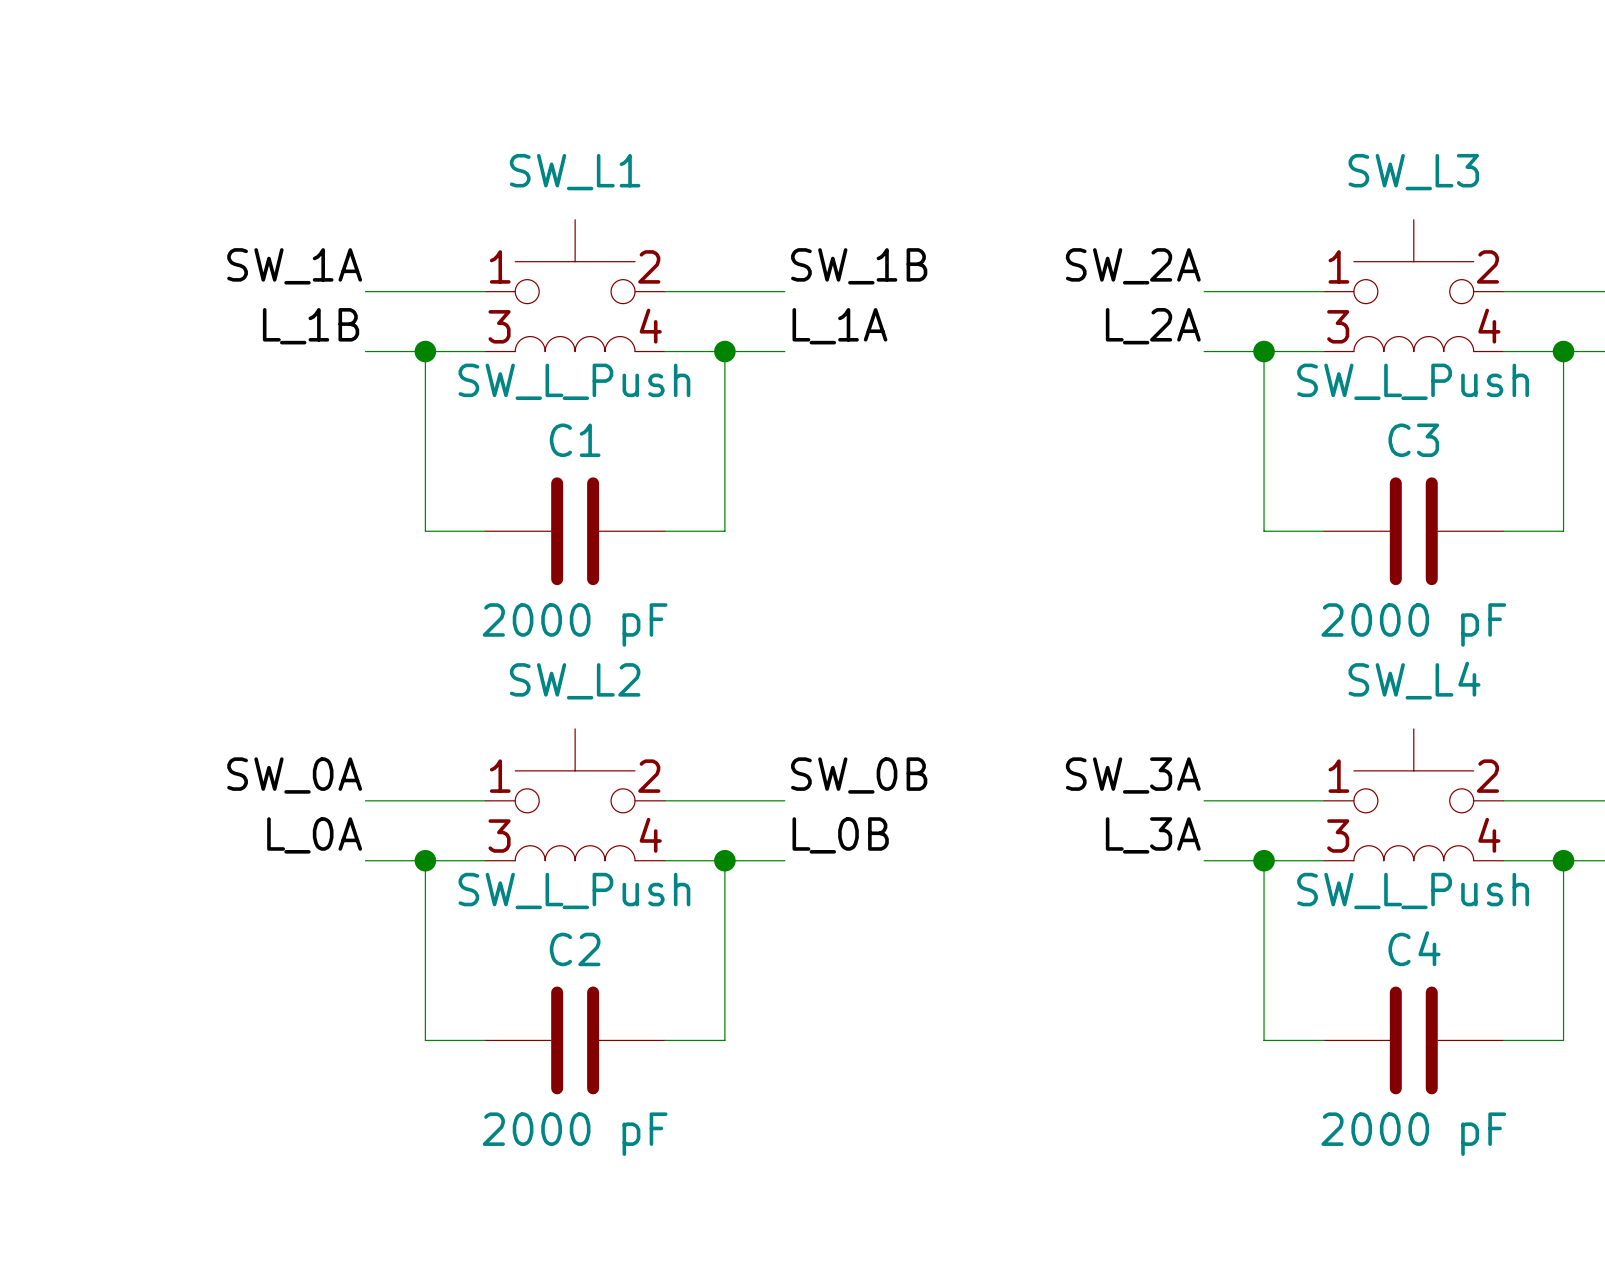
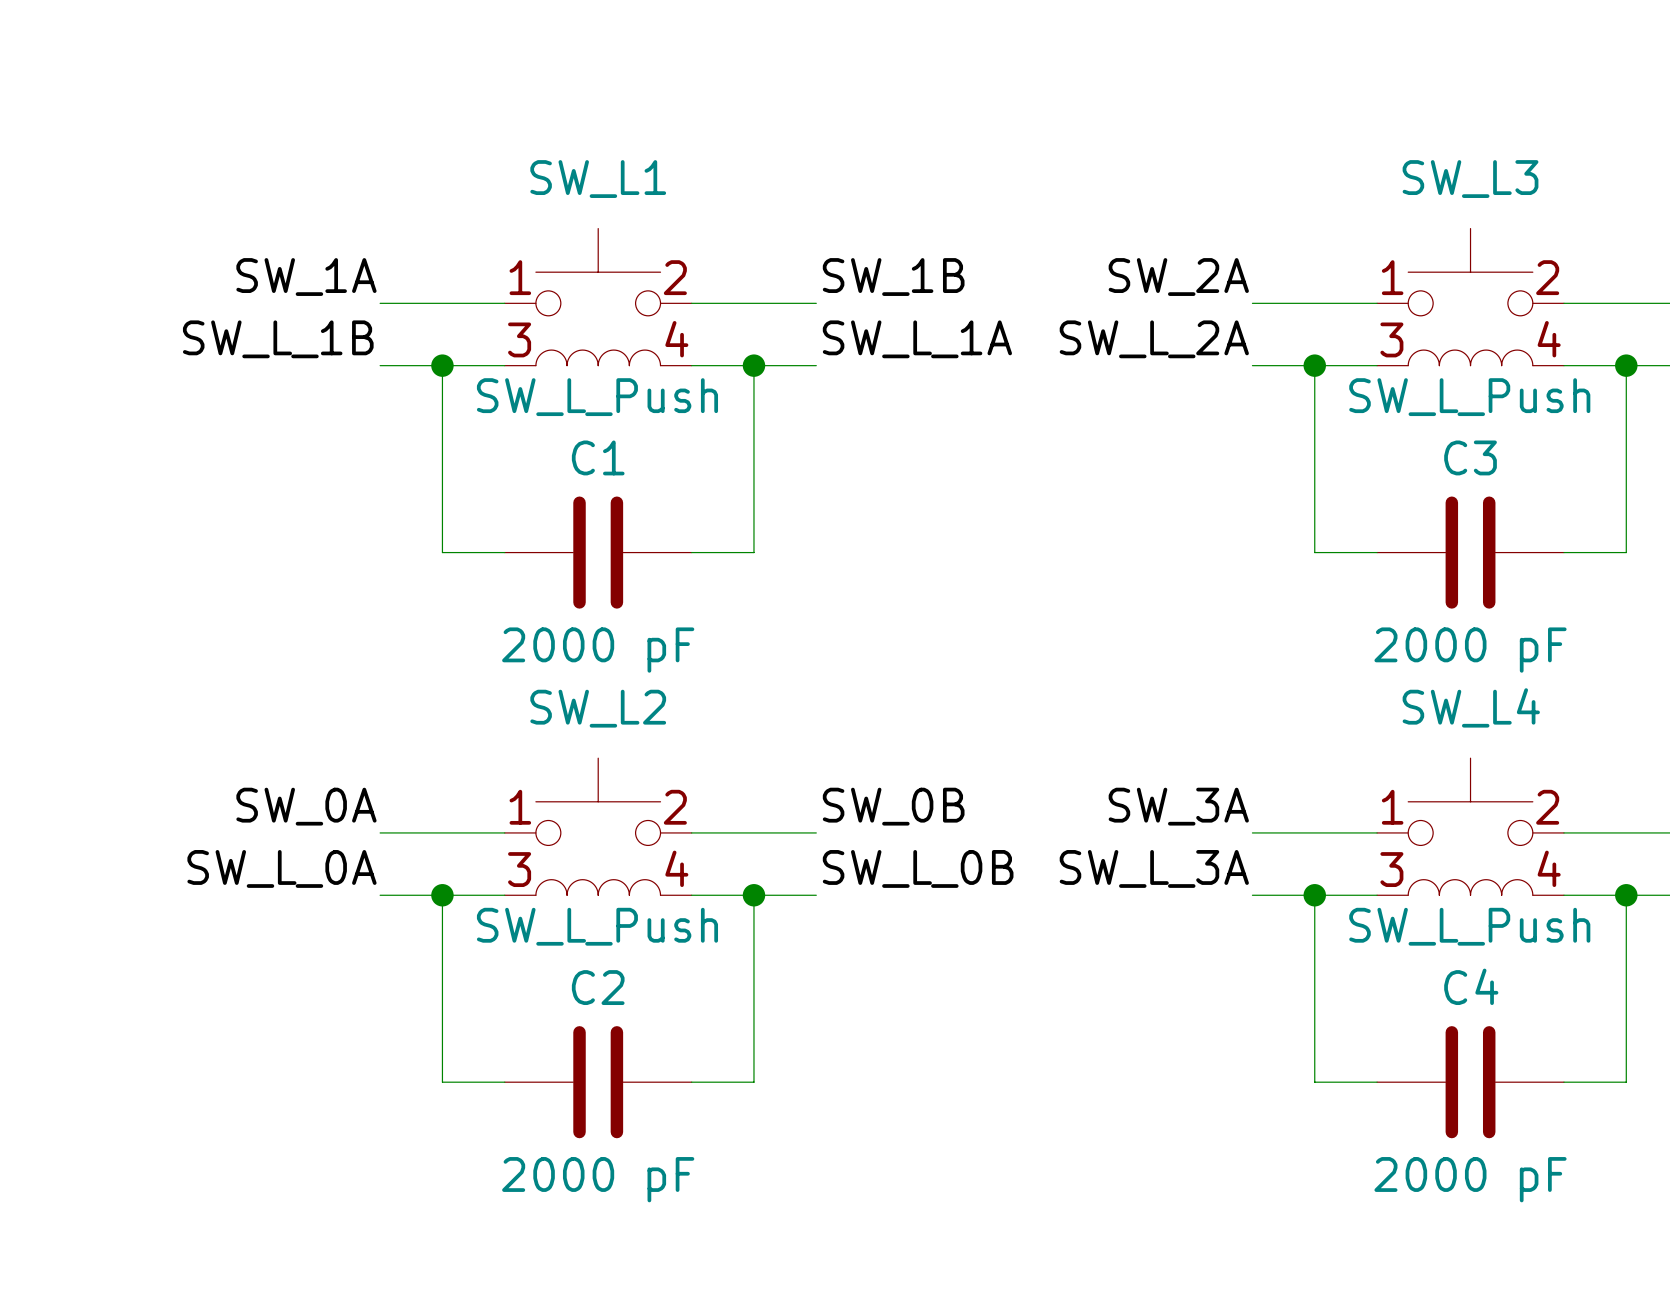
label: L_1B (311, 326) -> SW_L_1B (278, 339)
label: L_1A (839, 326) -> SW_L_1A (917, 339)
label: L_2A (1153, 326) -> SW_L_2A (1154, 339)
label: L_0A (314, 835) -> SW_L_0A (281, 868)
label: L_0B (840, 835) -> SW_L_0B (918, 868)
label: L_3A (1153, 835) -> SW_L_3A (1154, 868)

